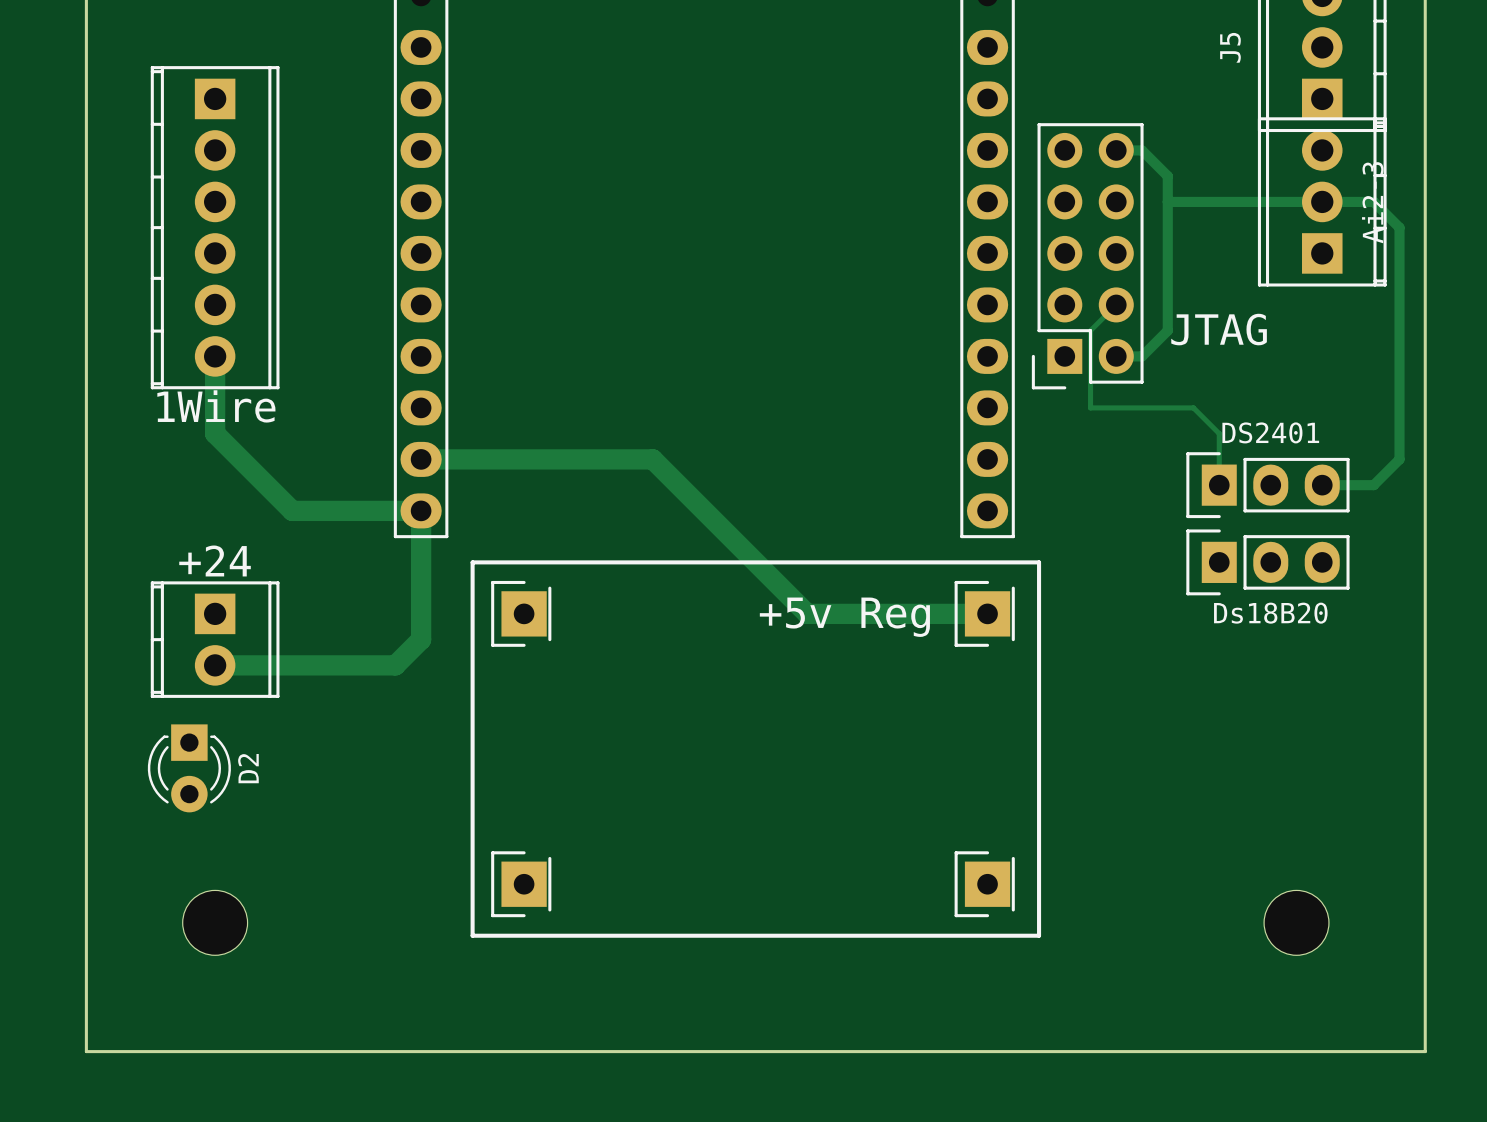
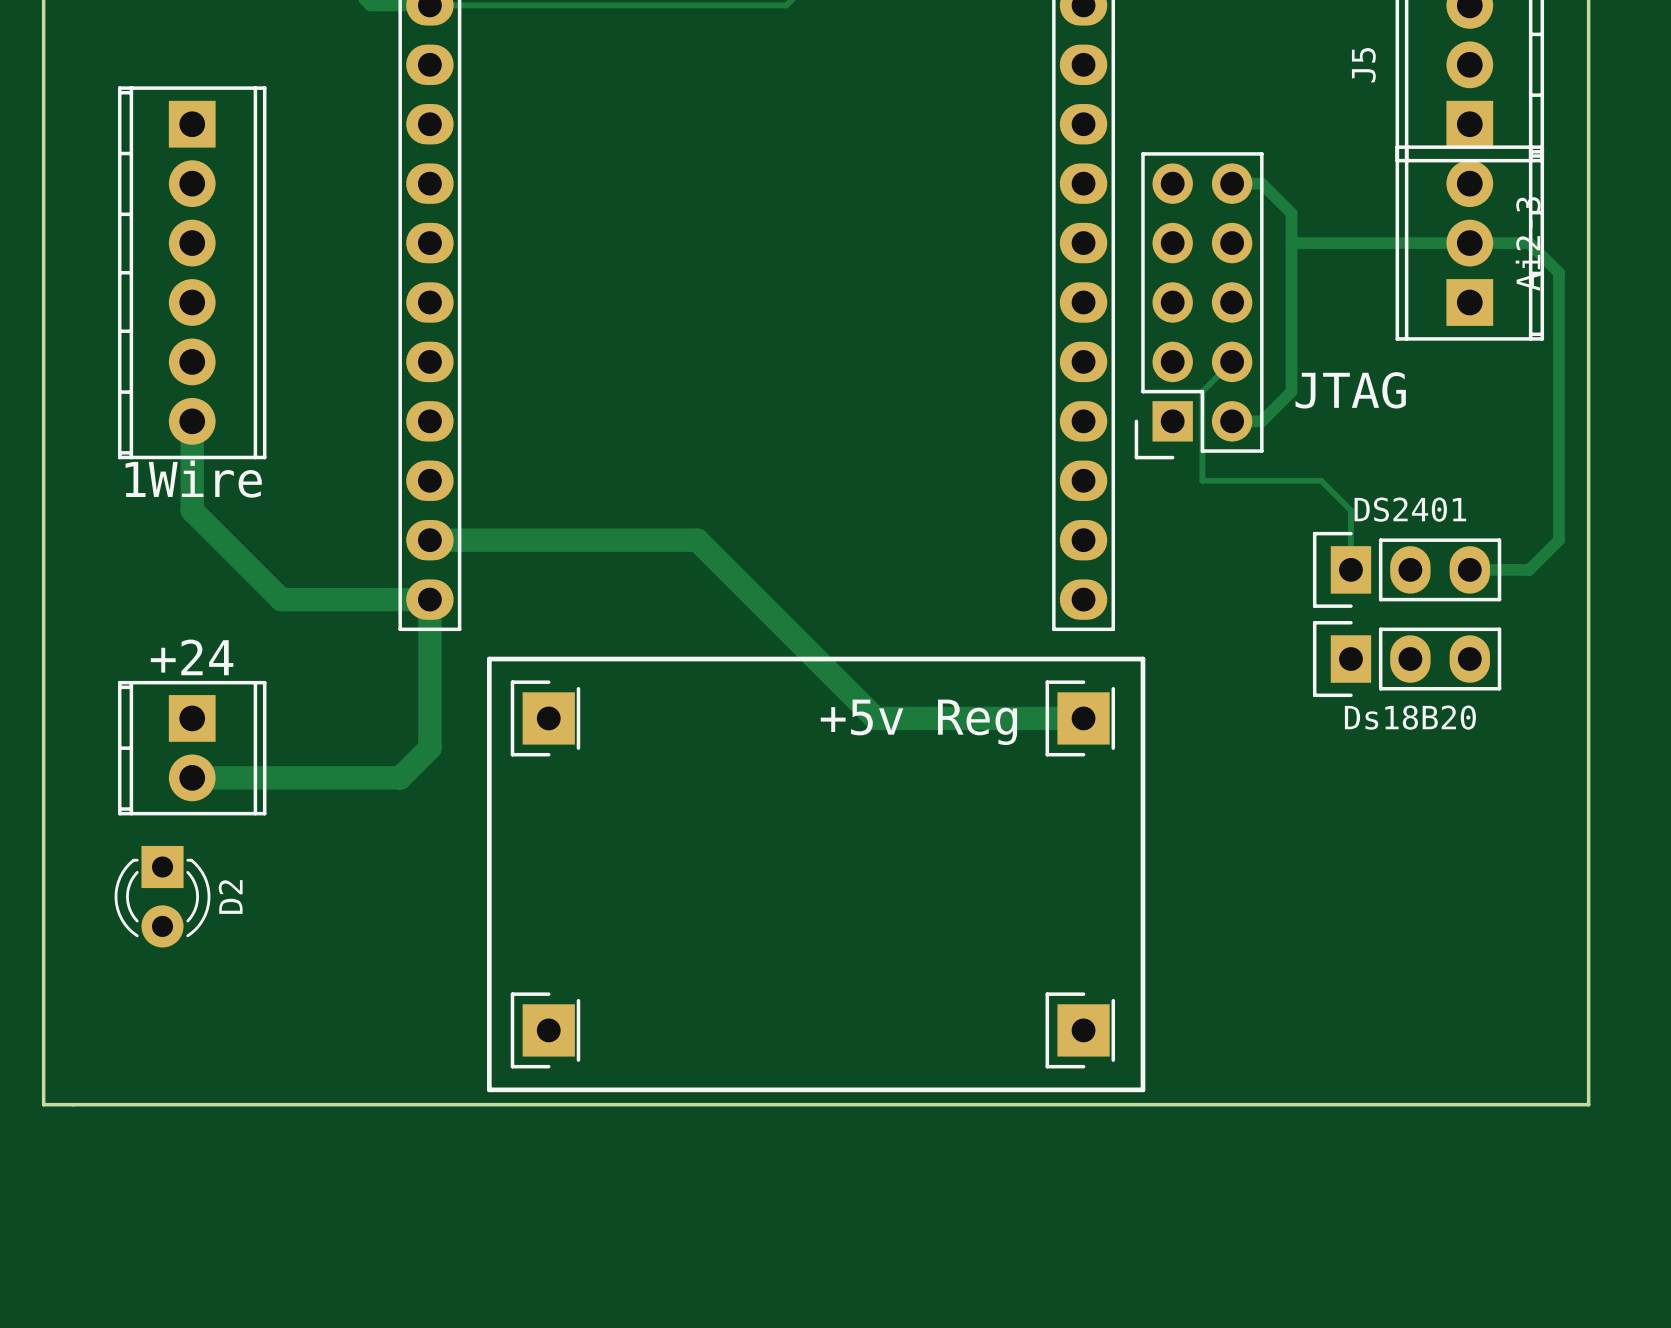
part: (215, 922) -> none
part: (1296, 922) -> none
board edge: (86, 948) (86, 1051) (1425, 1051) (1425, 948) -> (43, 1104) (1588, 1104)

